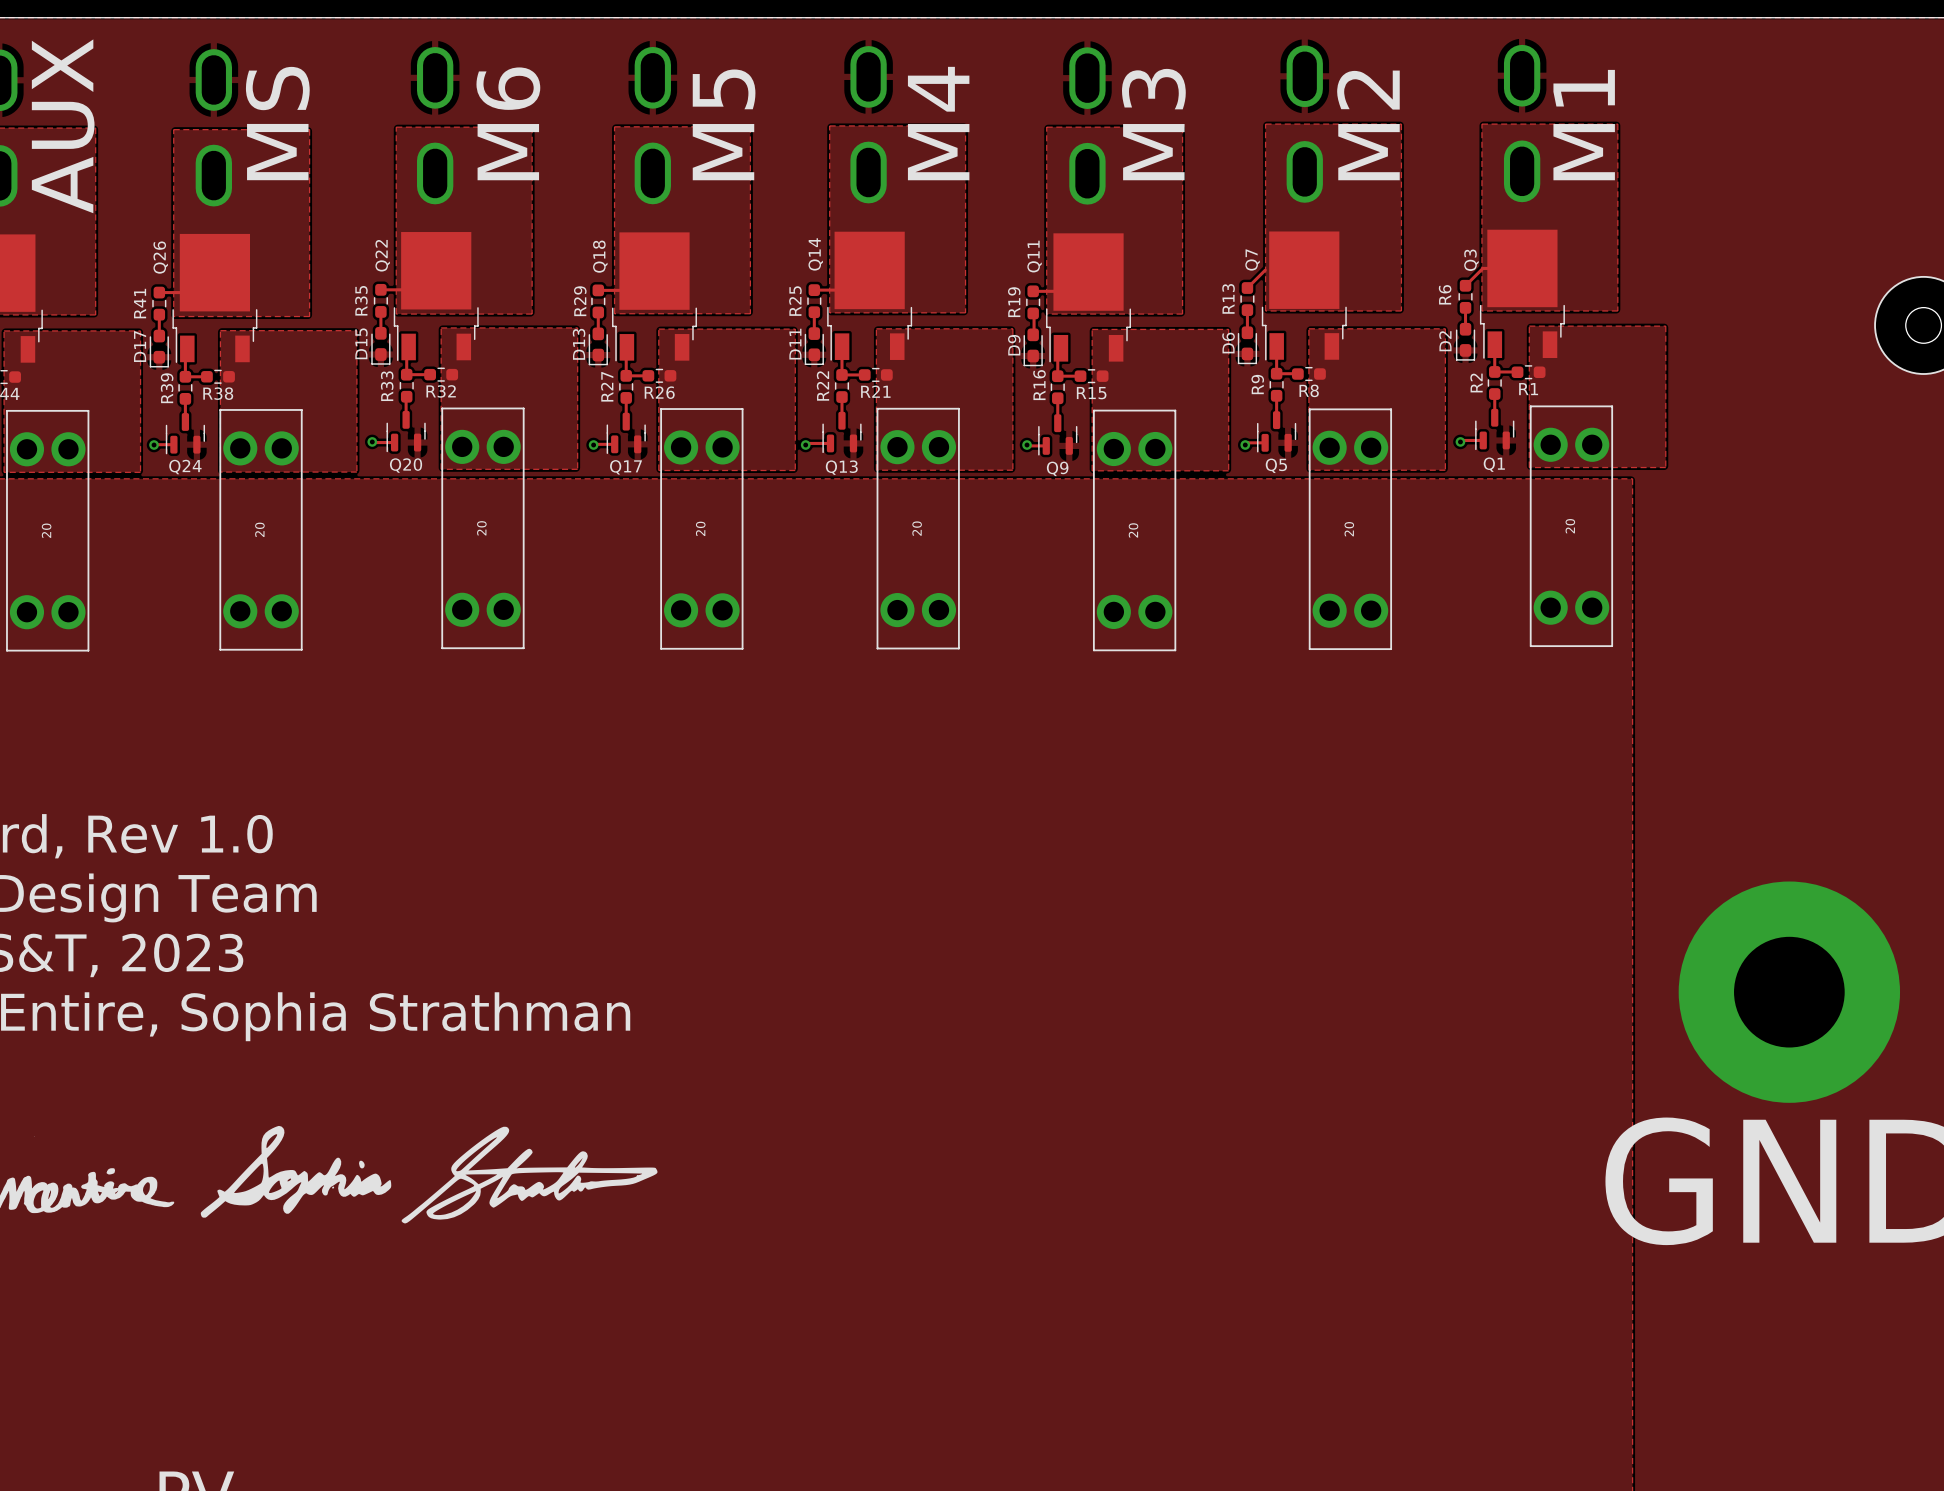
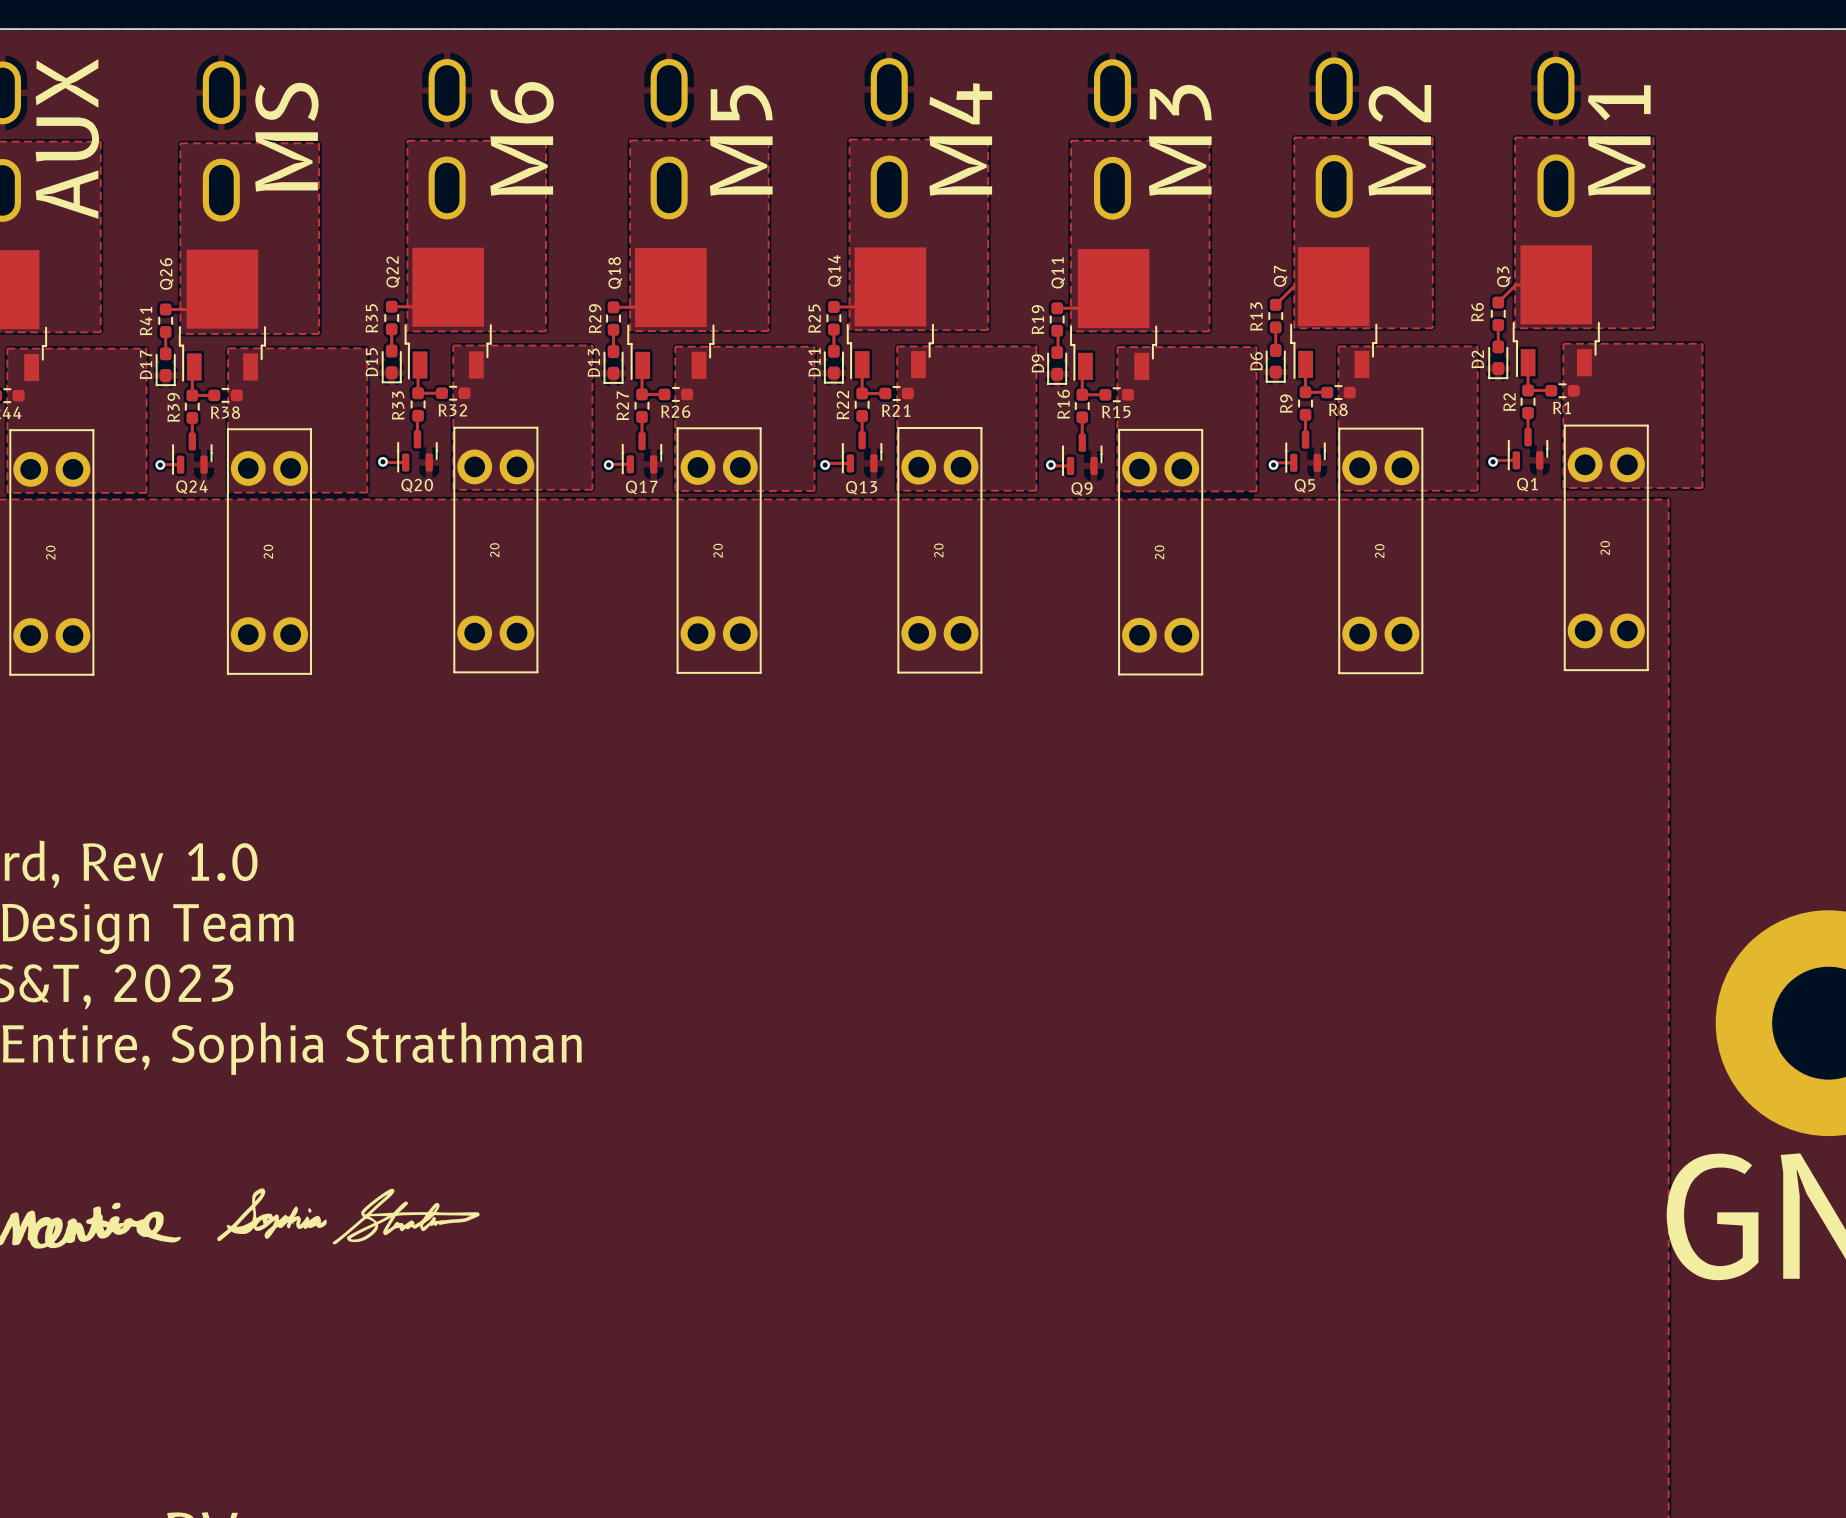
drawing: [200, 1125, 658, 1224] -> none
drawing: none -> [217, 1188, 480, 1245]

